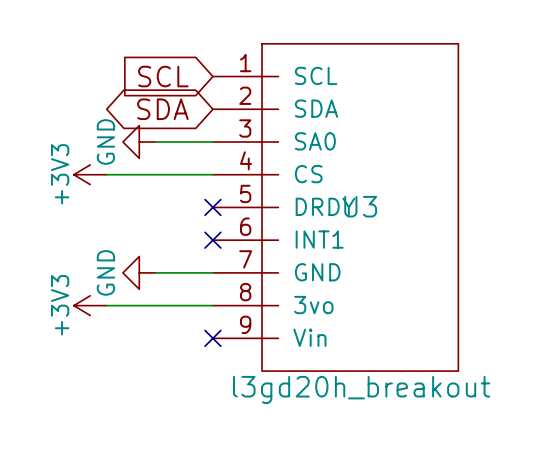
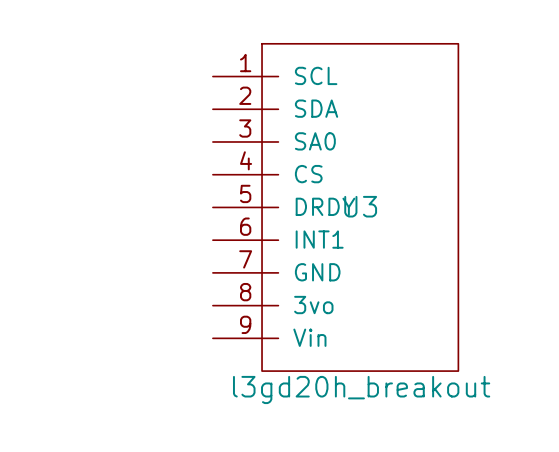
global label: SCL (163, 76) -> none
global label: SDA (162, 109) -> none
power symbol: GND (139, 141) -> none
wire: (155, 141) (212, 141) -> none
power symbol: +3V3 (90, 174) -> none
wire: (106, 174) (212, 174) -> none
no-connect mark: (212, 207) -> none
no-connect mark: (212, 240) -> none
power symbol: GND (139, 272) -> none
wire: (155, 272) (212, 272) -> none
power symbol: +3V3 (90, 305) -> none
wire: (106, 305) (212, 305) -> none
no-connect mark: (212, 338) -> none

